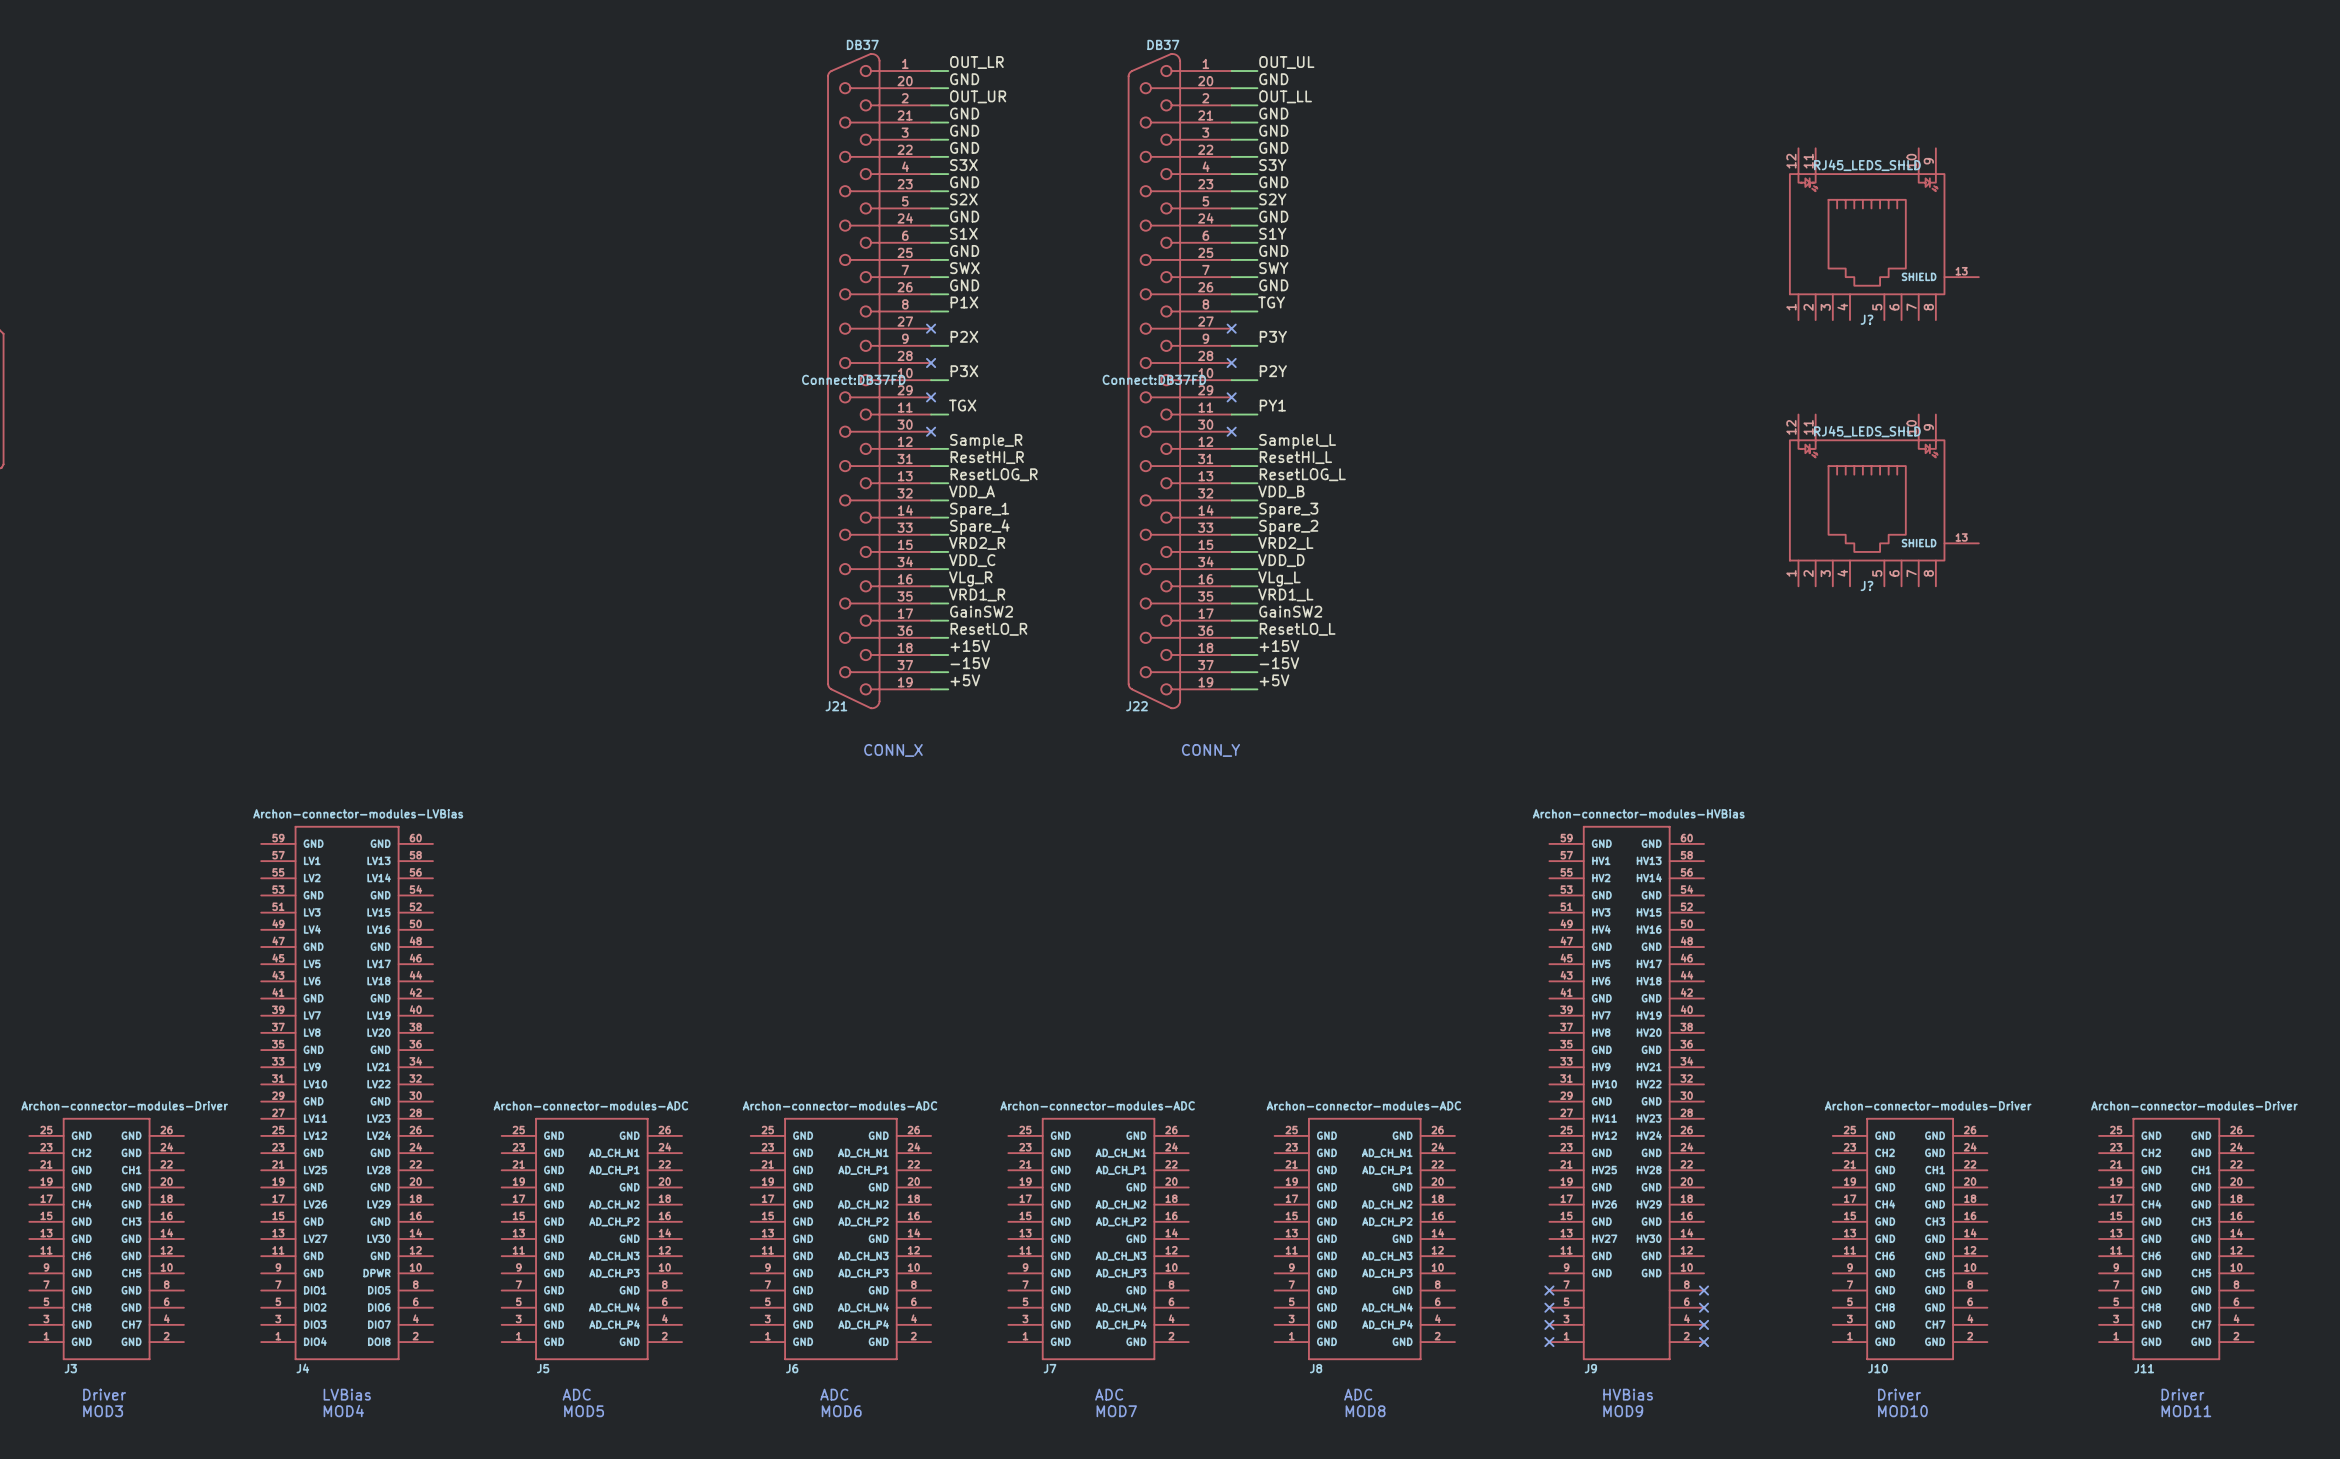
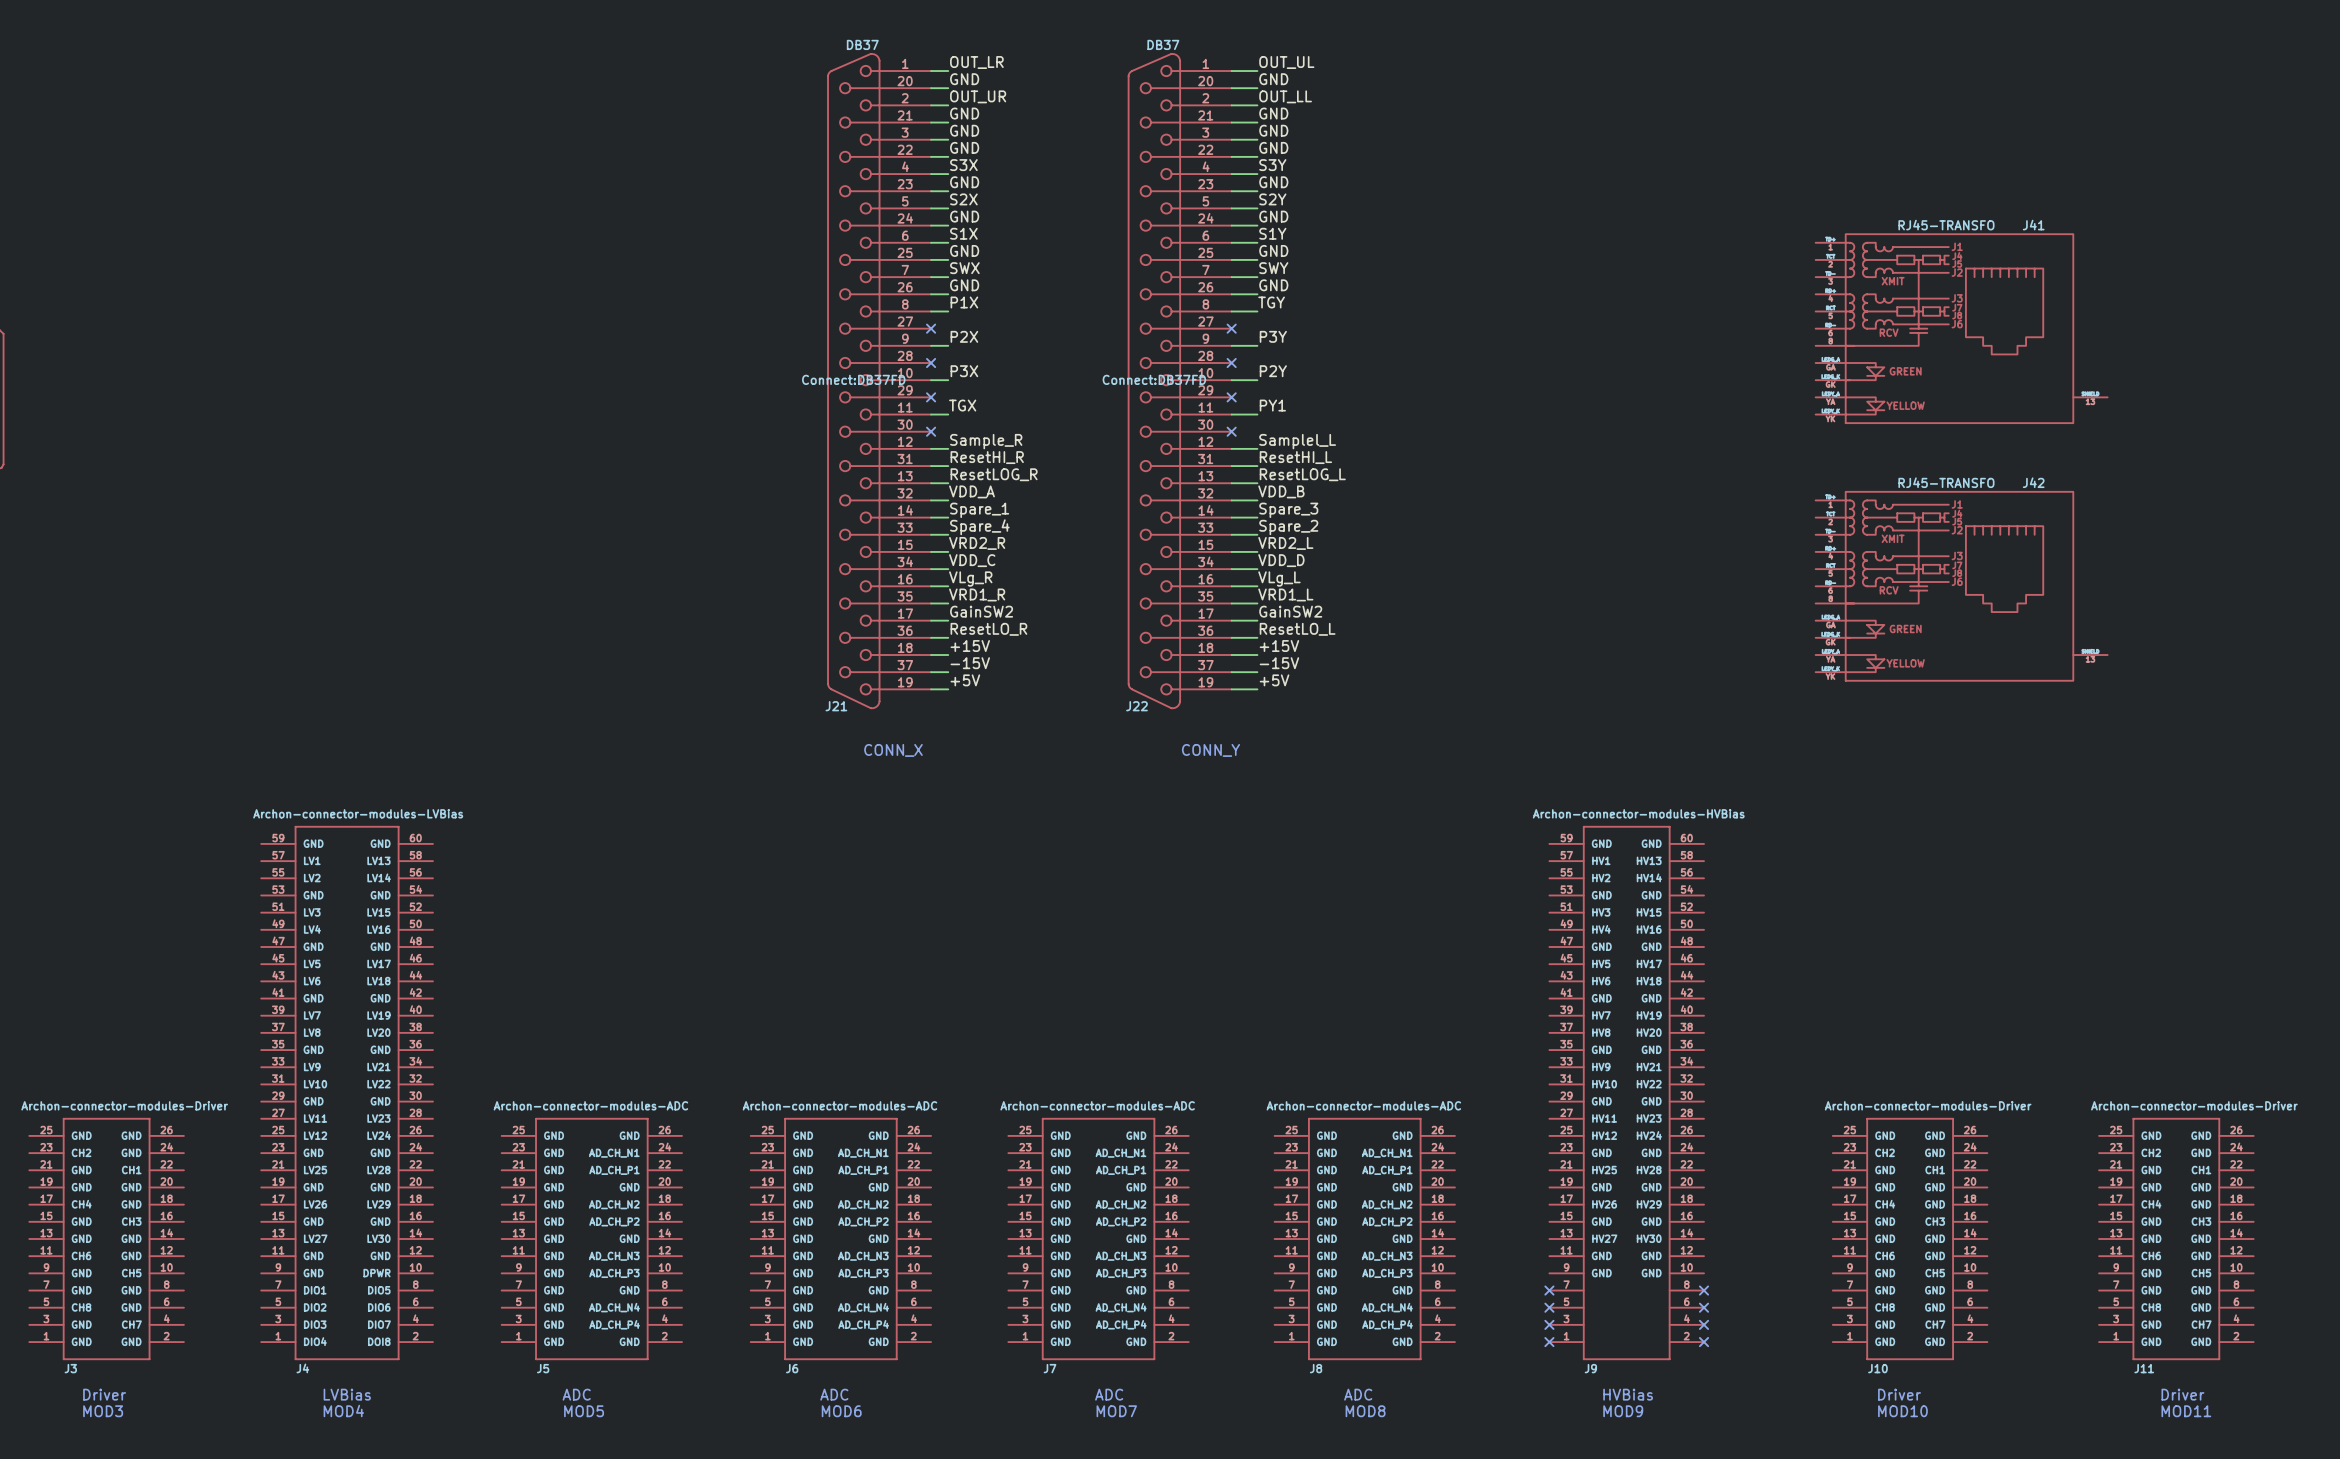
J?: RJ45_LEDS_SHLD (1884, 234) -> none
J41: none -> RJ45-TRANSFO (1961, 328)
J?: RJ45_LEDS_SHLD (1884, 500) -> none
J42: none -> RJ45-TRANSFO (1961, 586)

